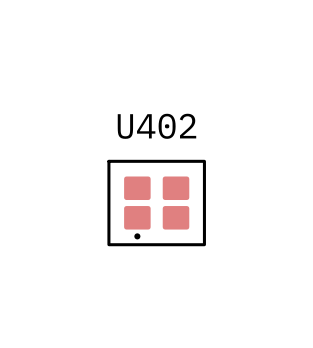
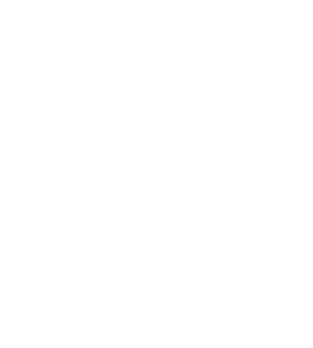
U402: (156, 203) -> none

